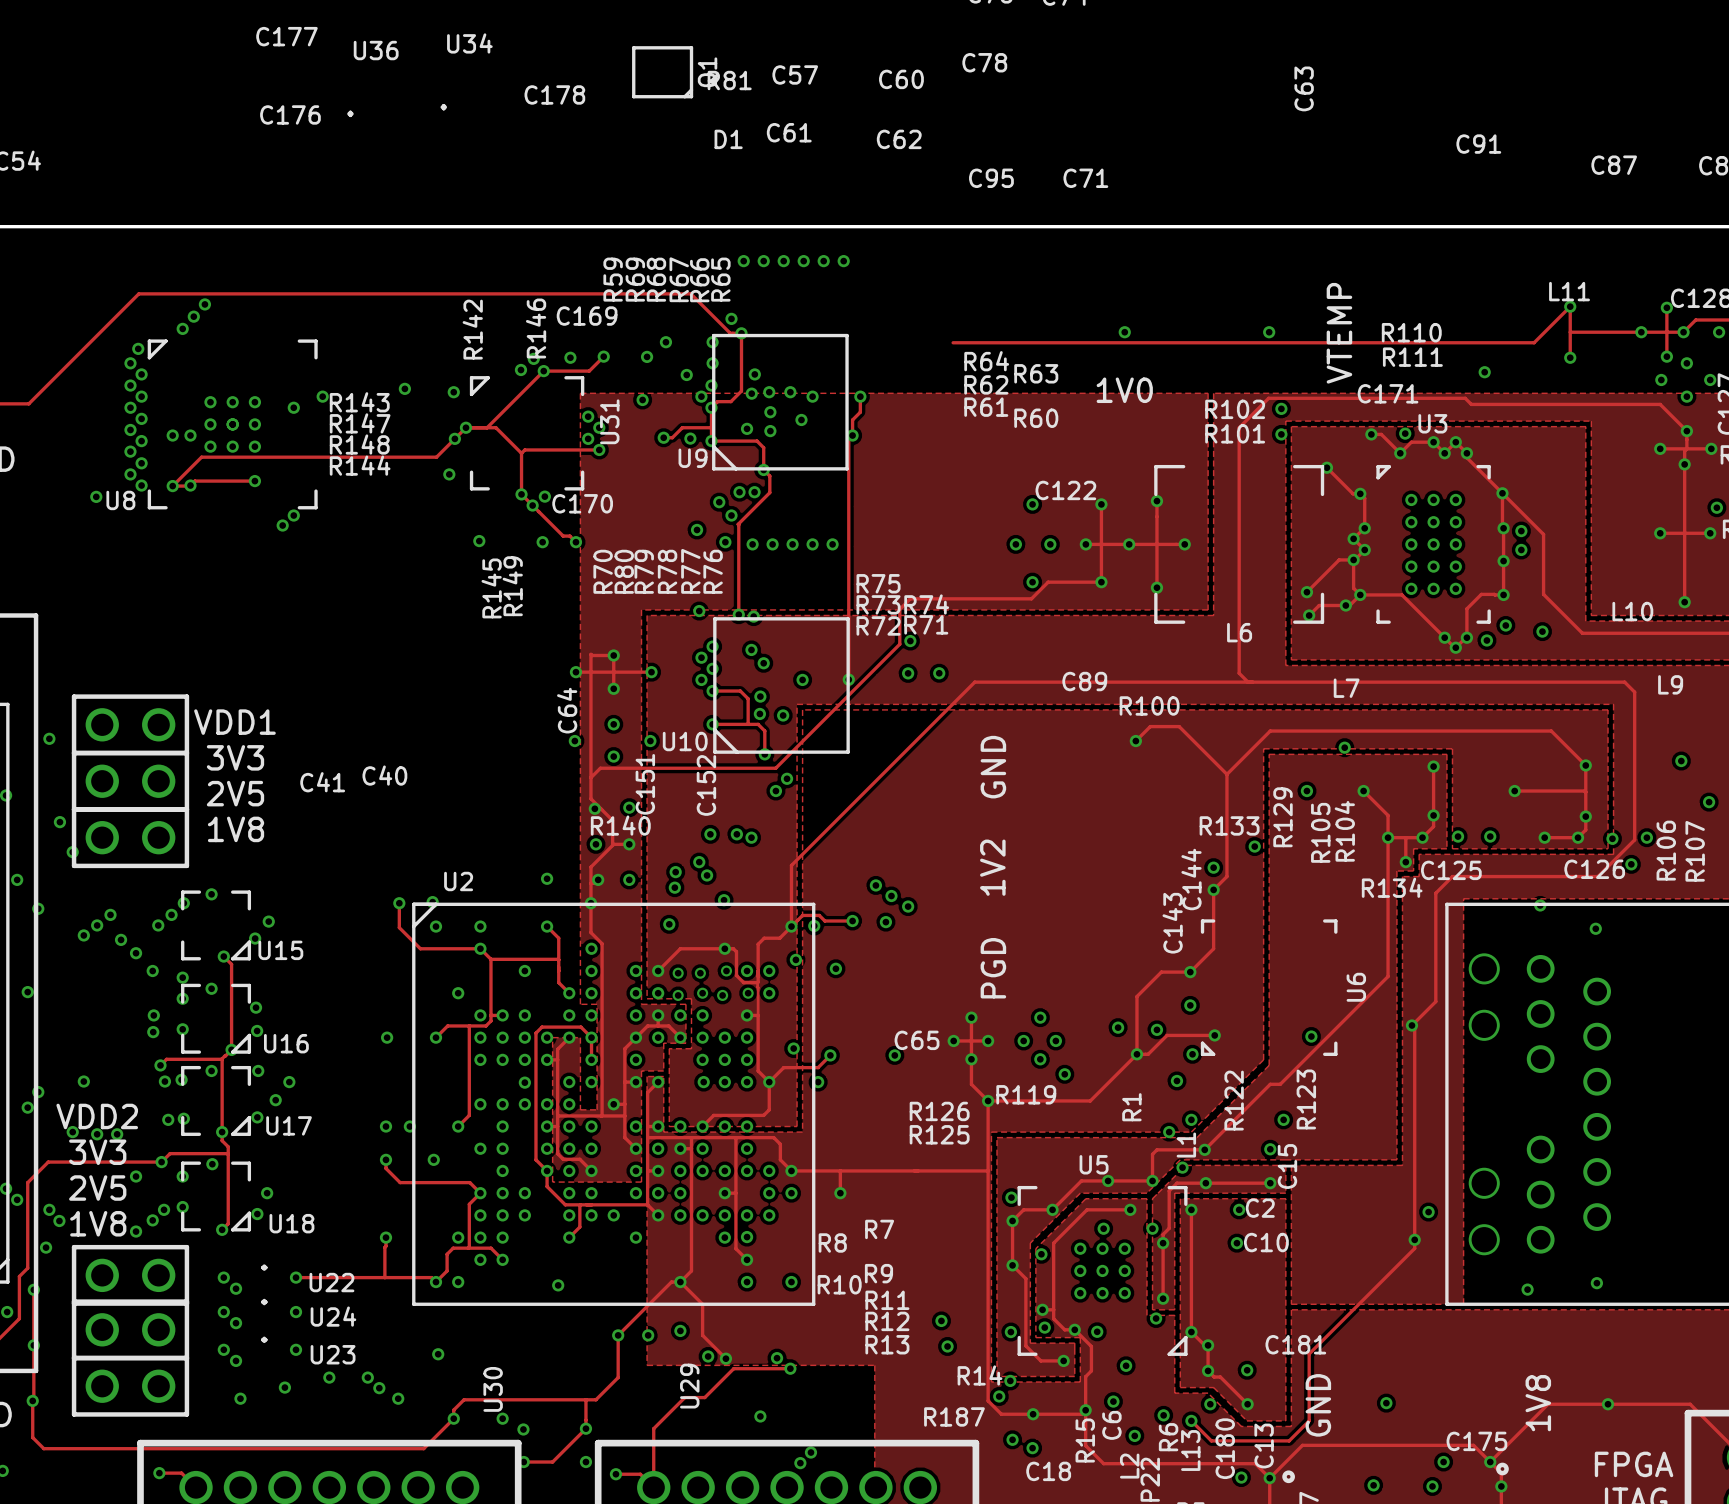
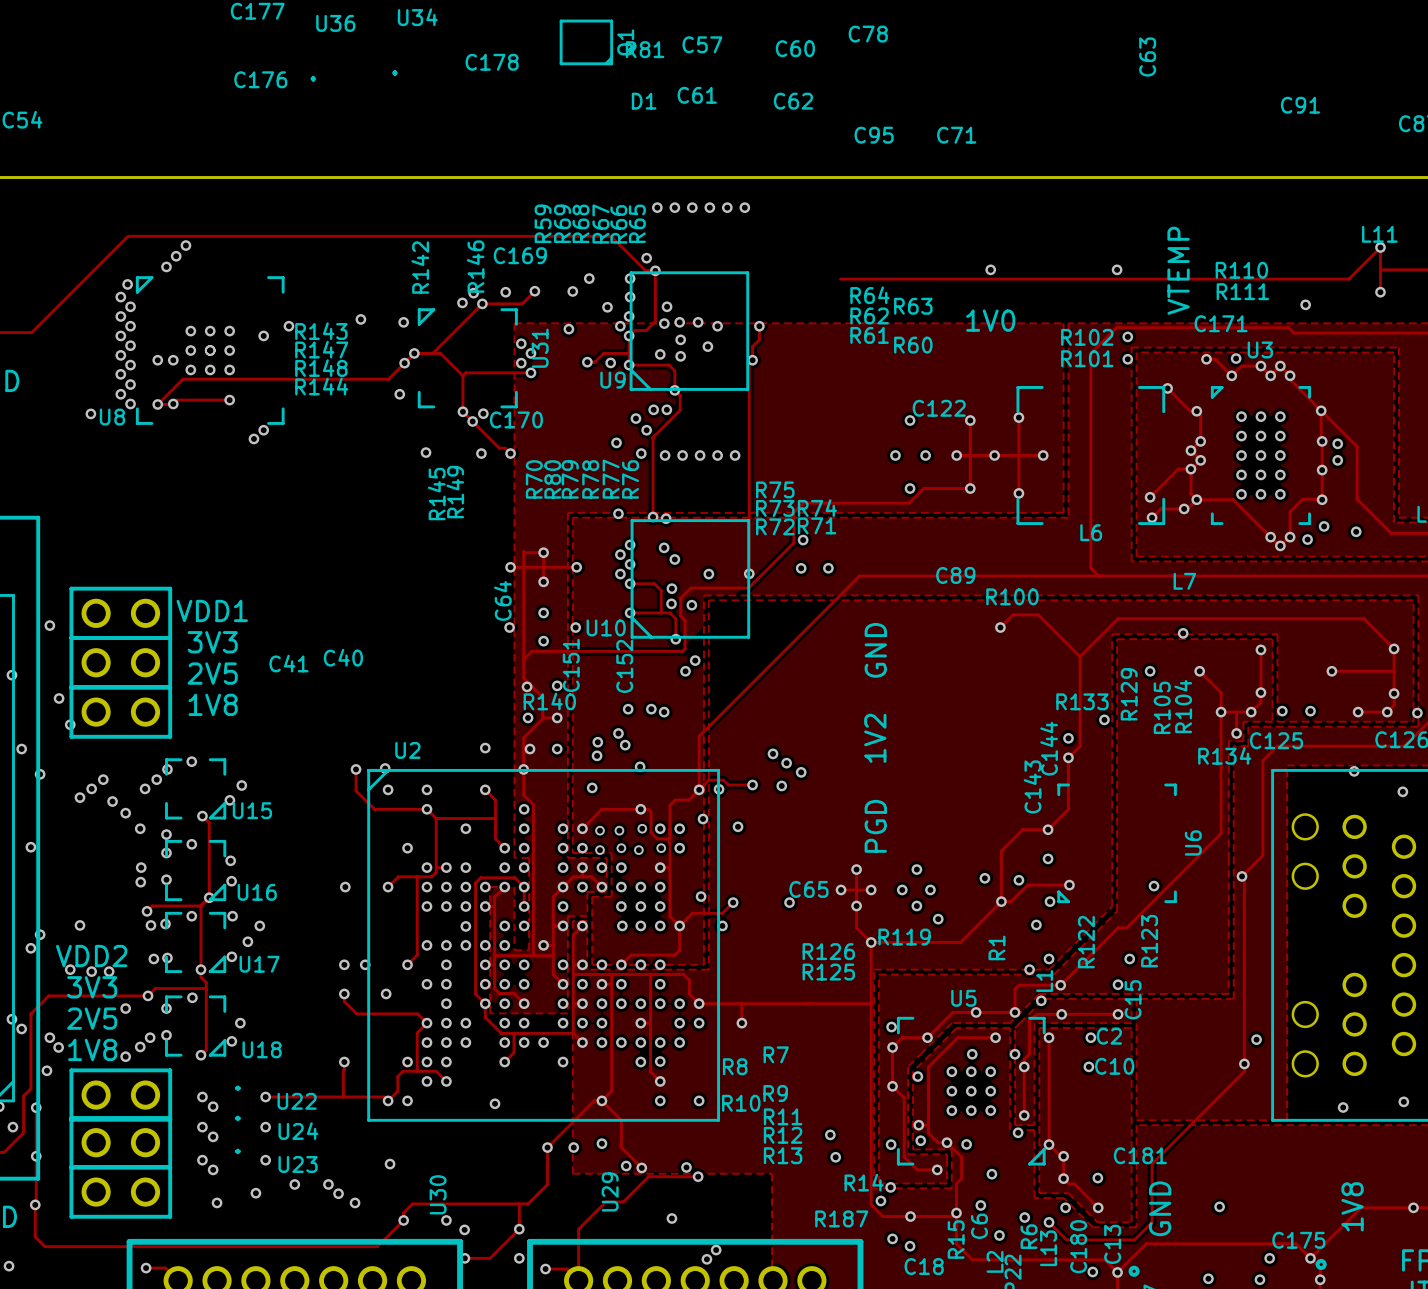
track: (848, 695) (775, 768) (772, 768) -> (748, 588) (691, 588) (680, 598) (680, 616) (685, 620) (685, 648) (682, 651)

